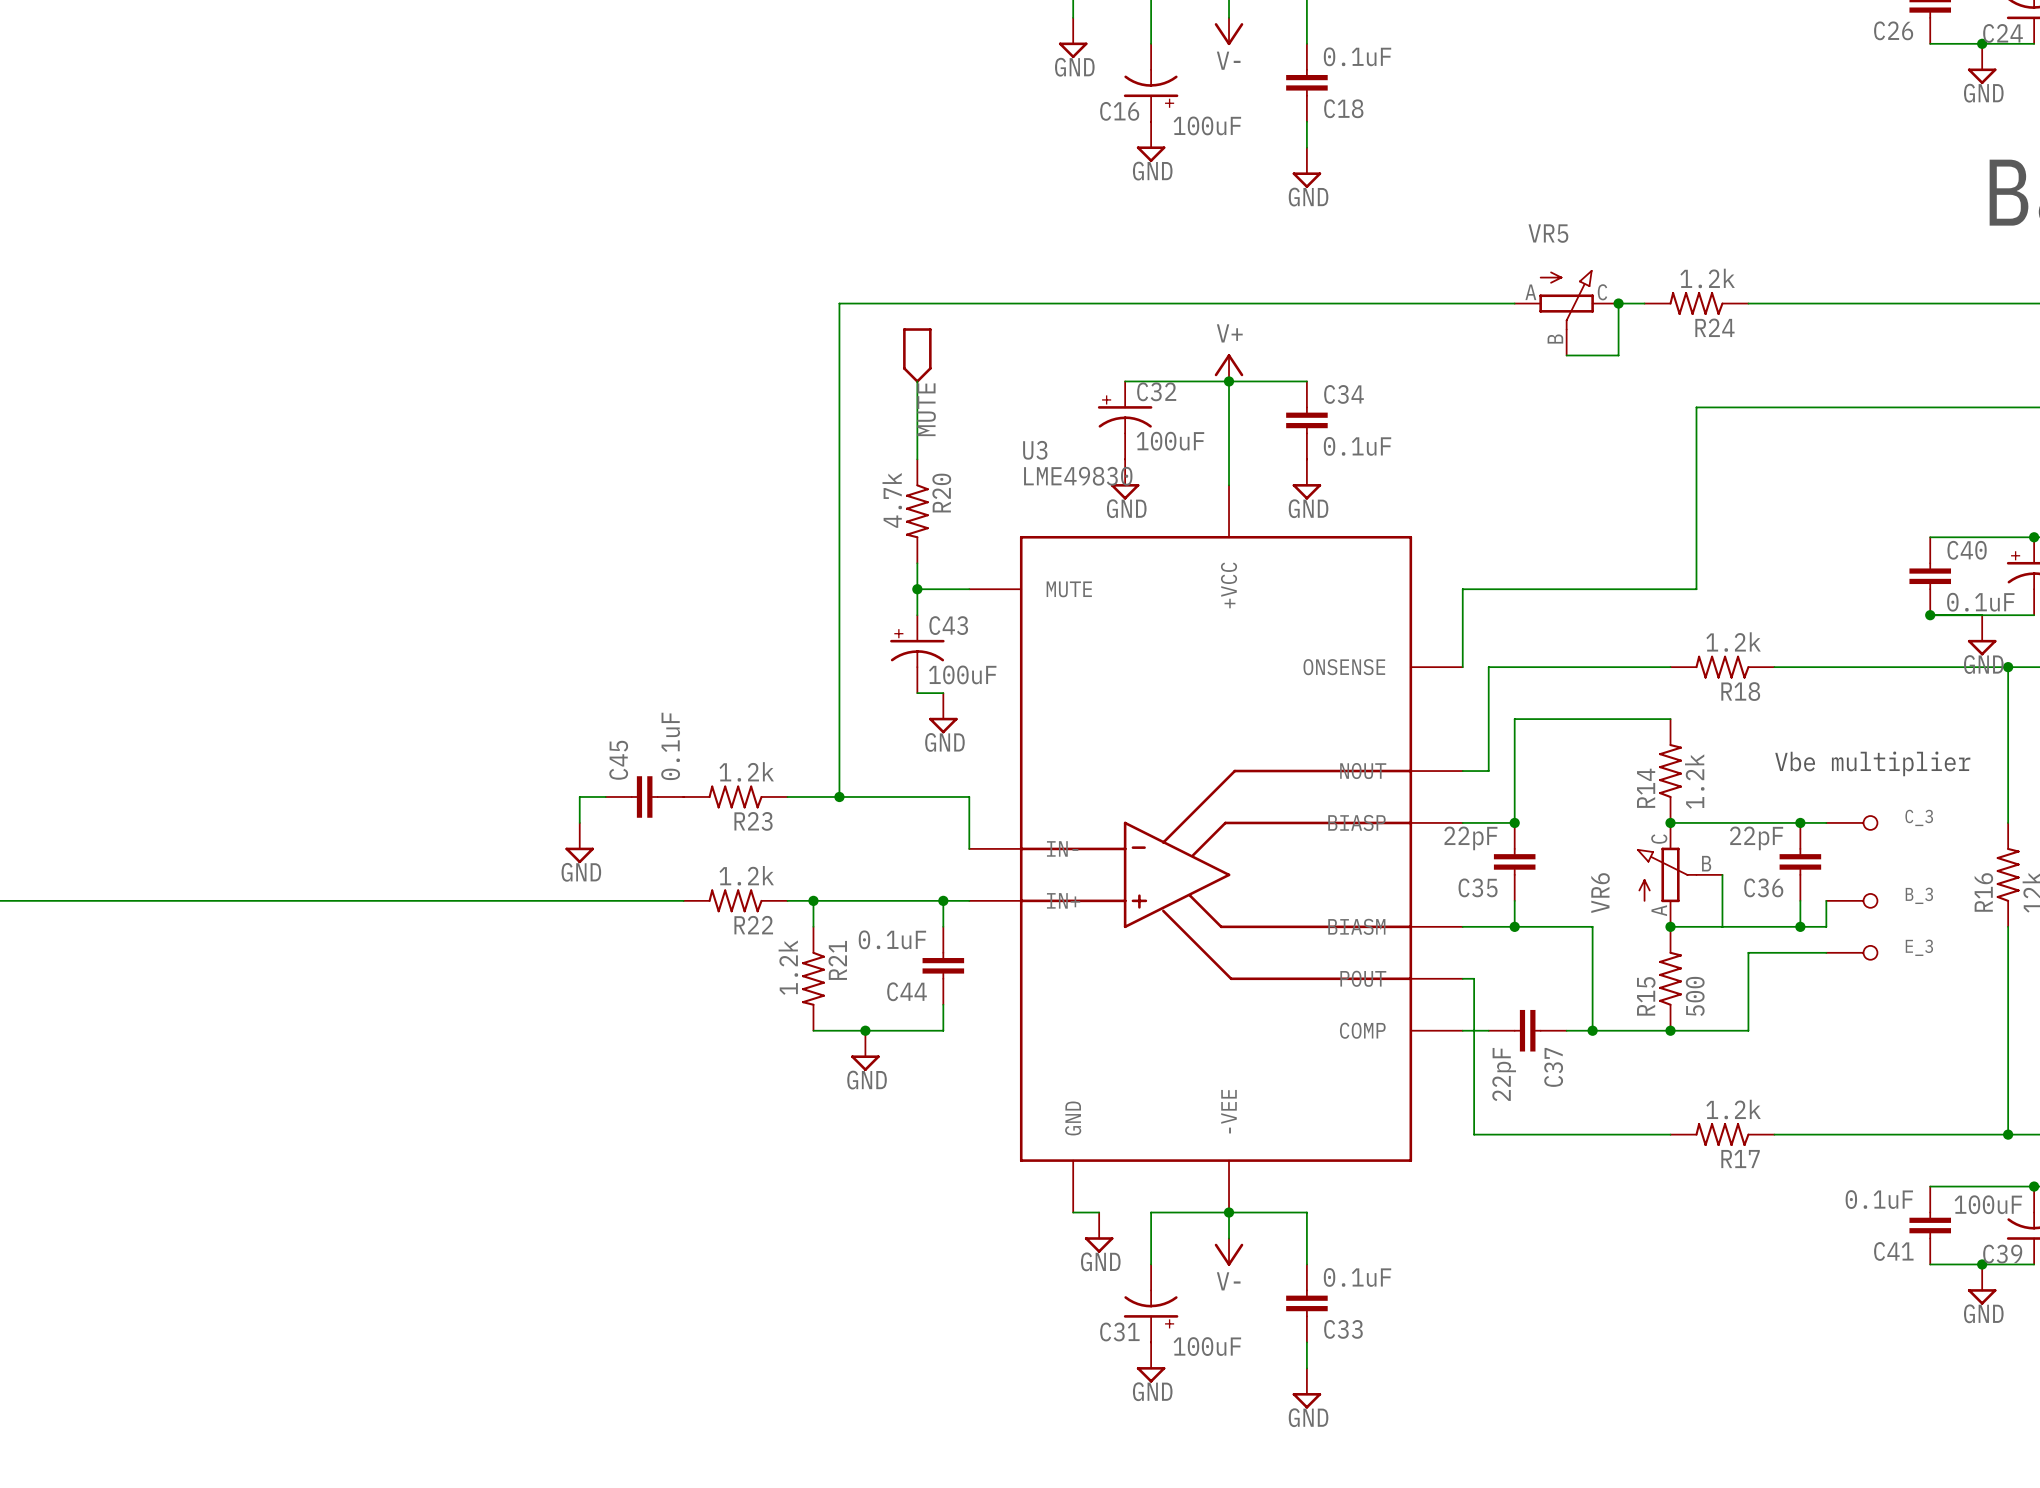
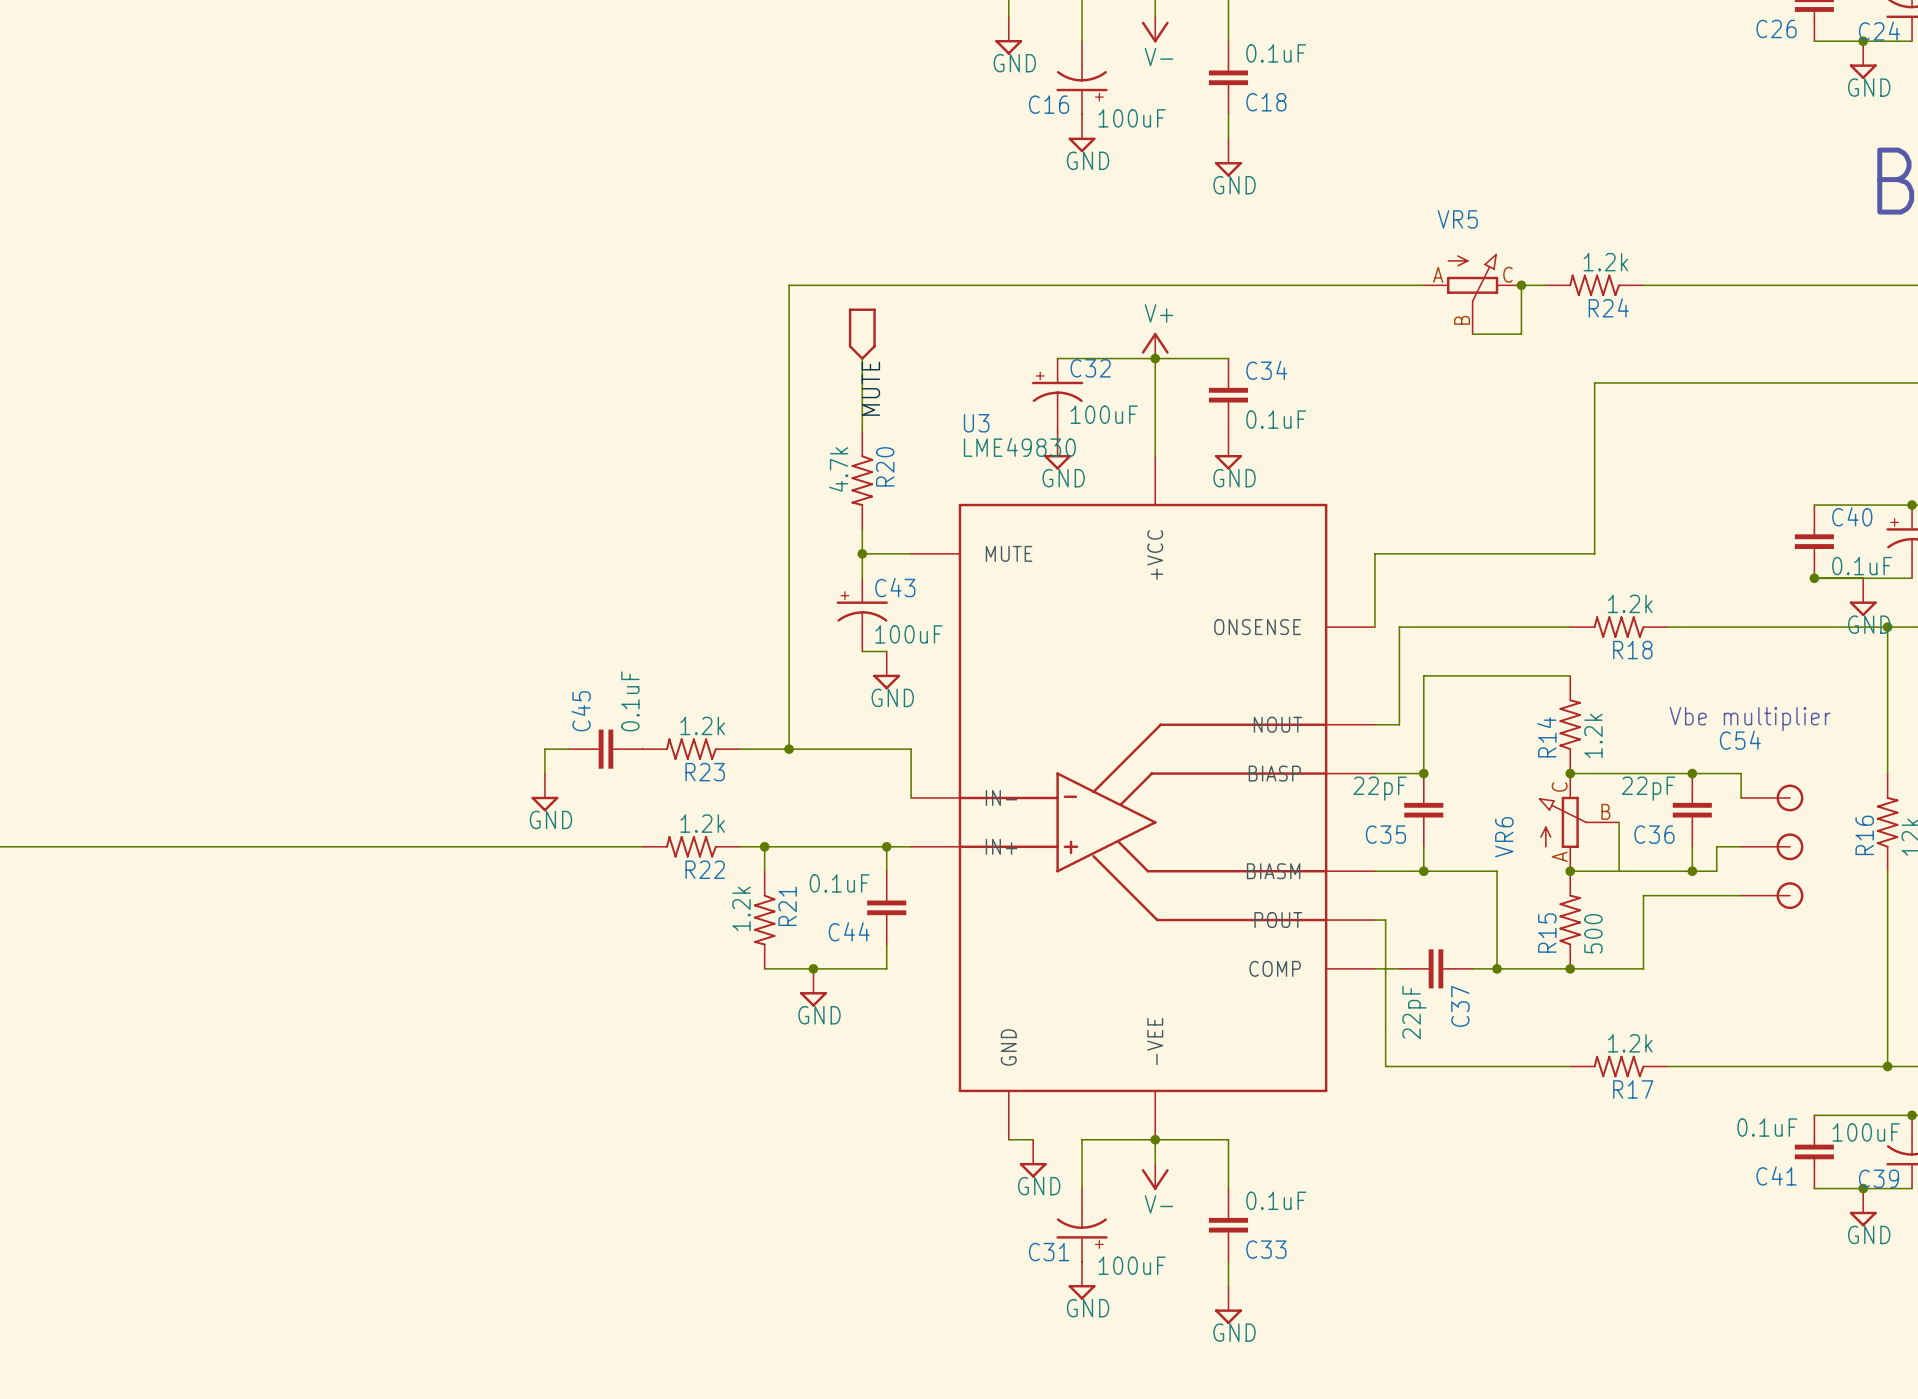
wire: none -> (1716, 773) (1741, 773) (1741, 797)
C_3: (1851, 822) -> none
B_3: (1851, 900) -> none
C54: none -> (1772, 846)
E_3: (1851, 952) -> none

